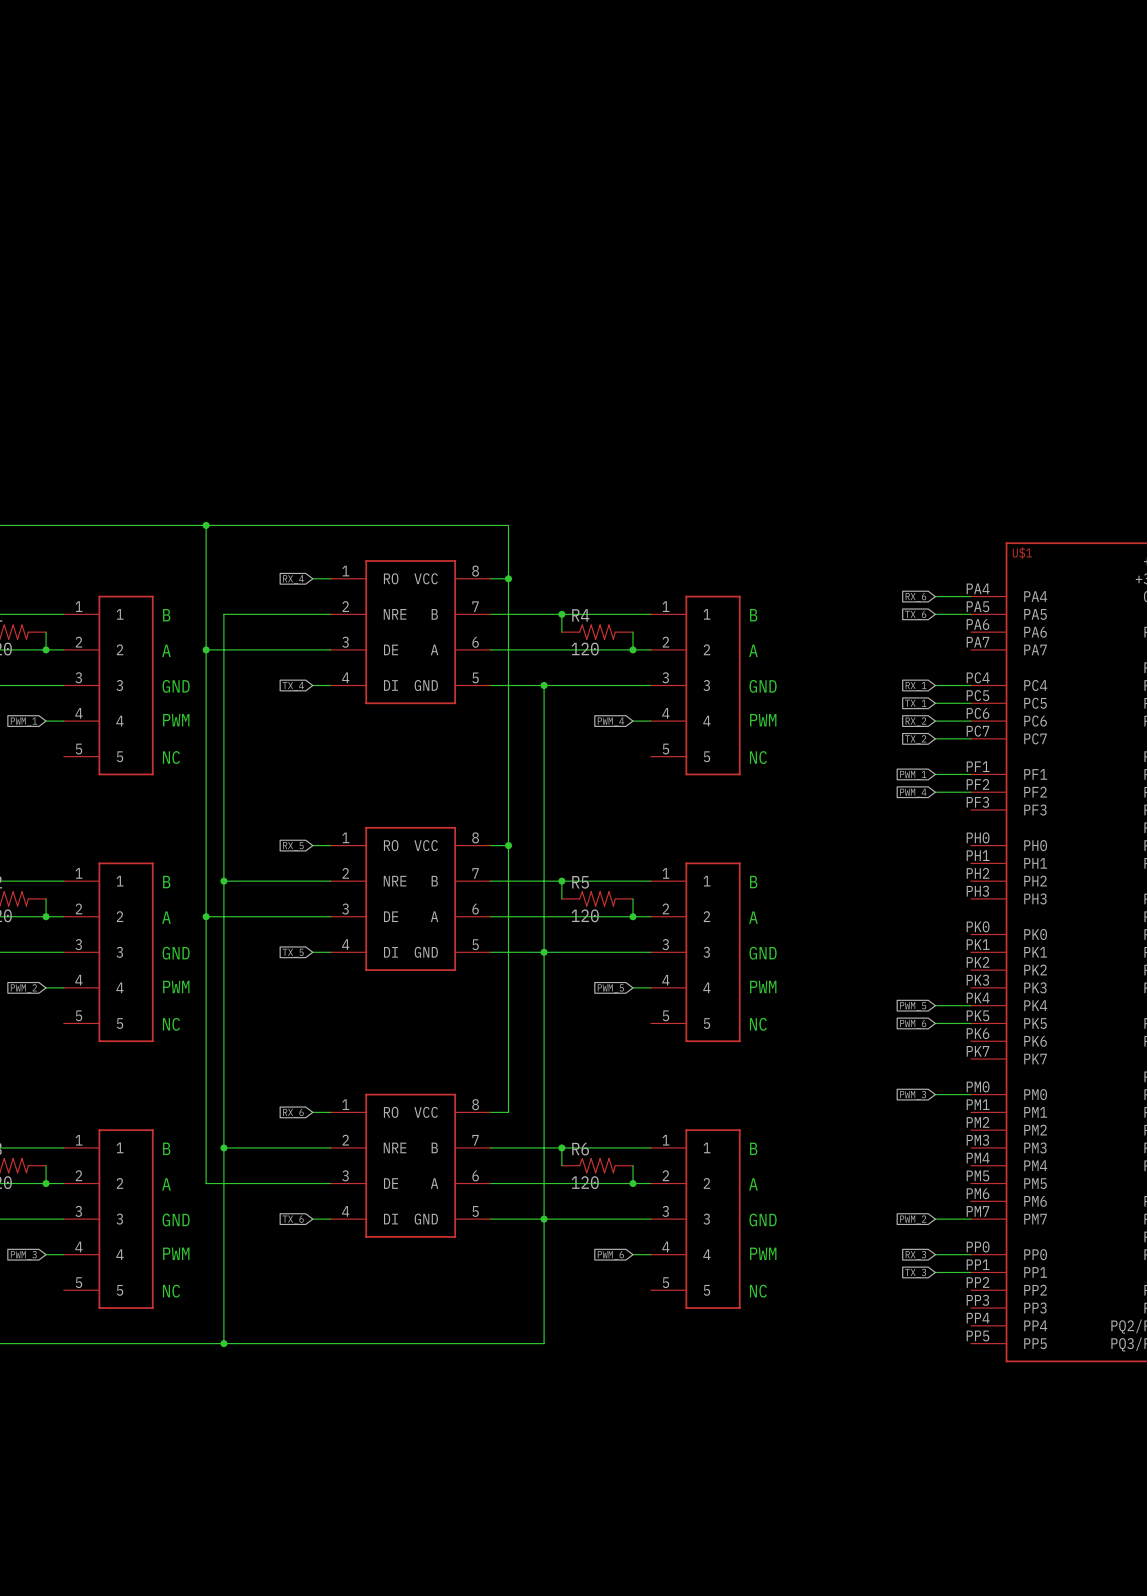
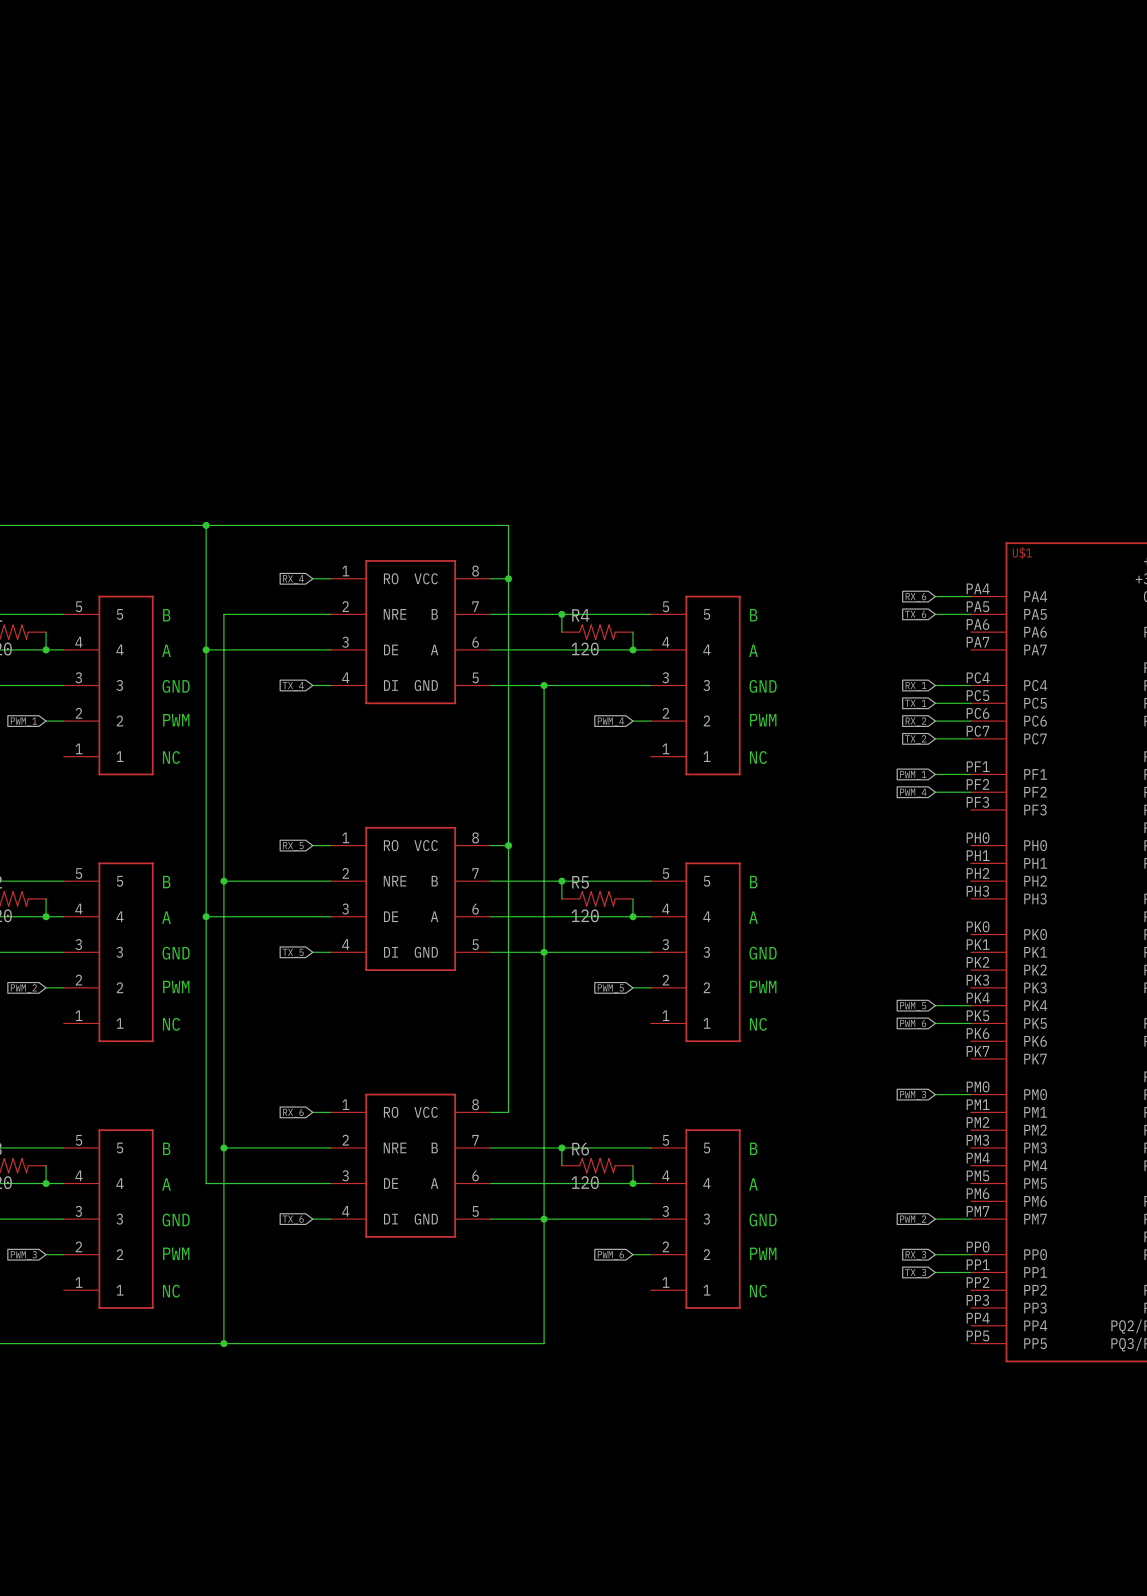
part flip: as is (126, 685) -> up-down (126, 685)
part flip: as is (713, 685) -> up-down (713, 685)
part flip: as is (126, 952) -> up-down (126, 952)
part flip: as is (713, 952) -> up-down (713, 952)
part flip: as is (126, 1219) -> up-down (126, 1219)
part flip: as is (713, 1219) -> up-down (713, 1219)

